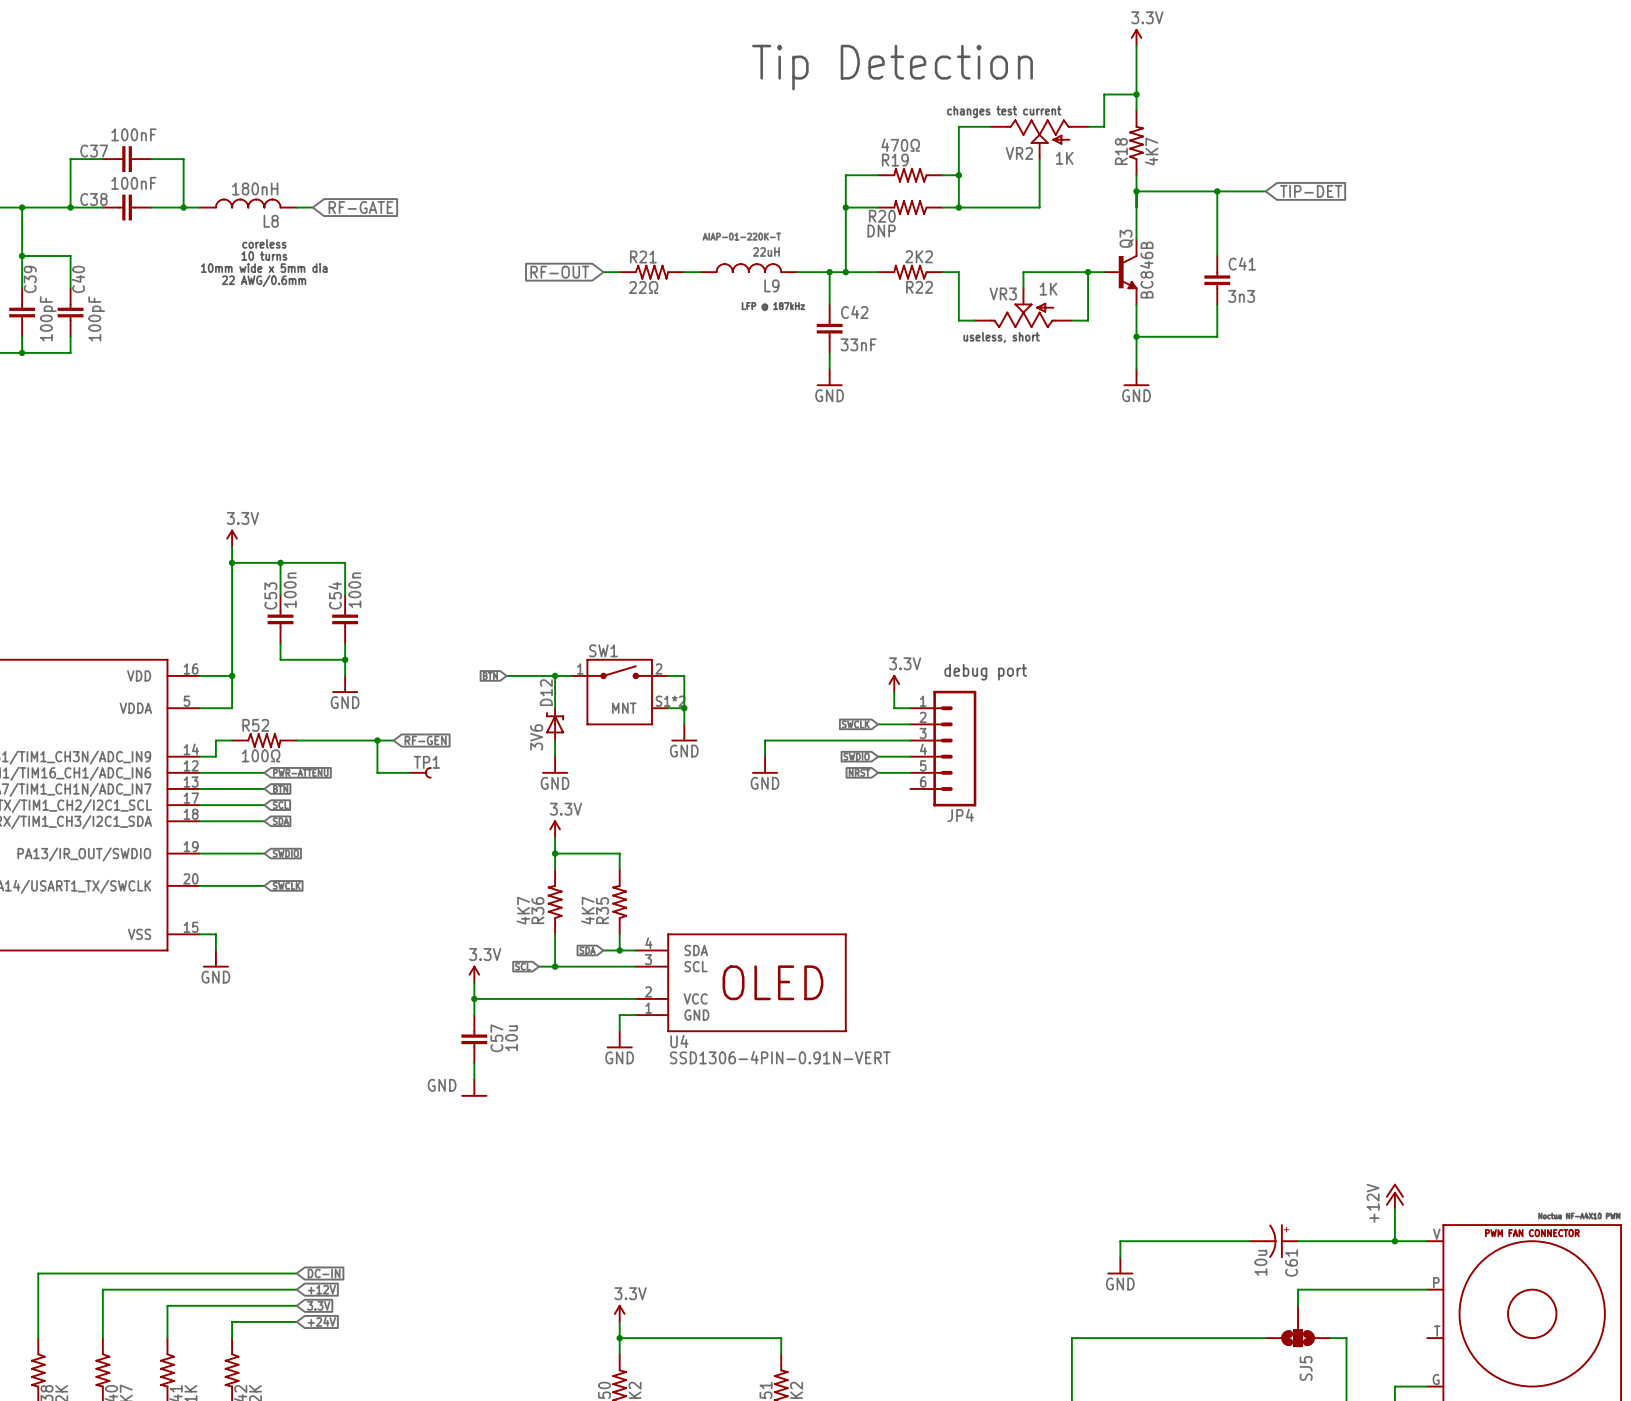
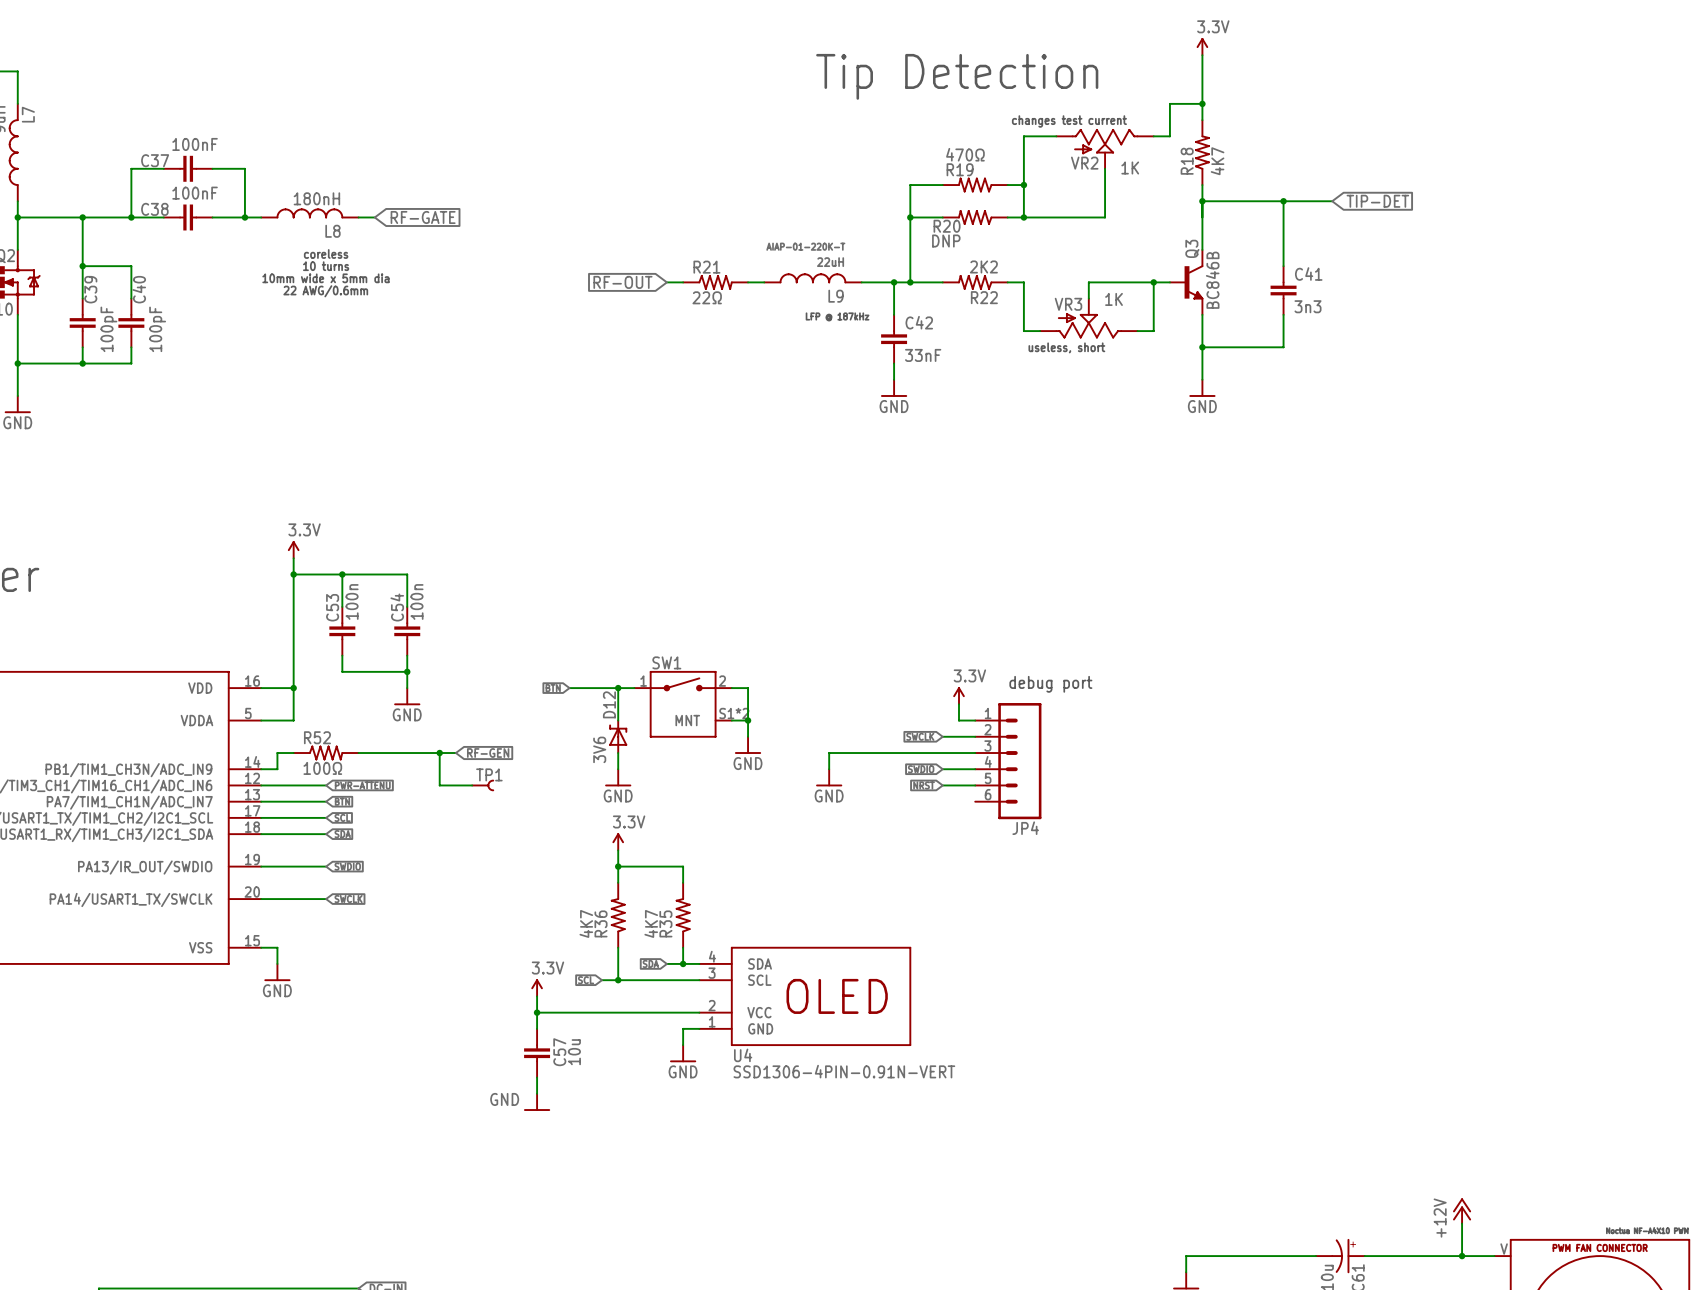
VR2 flip: as is (1039, 131) -> left-right (1105, 141)
VR3 flip: as is (1023, 315) -> left-right (1088, 325)

